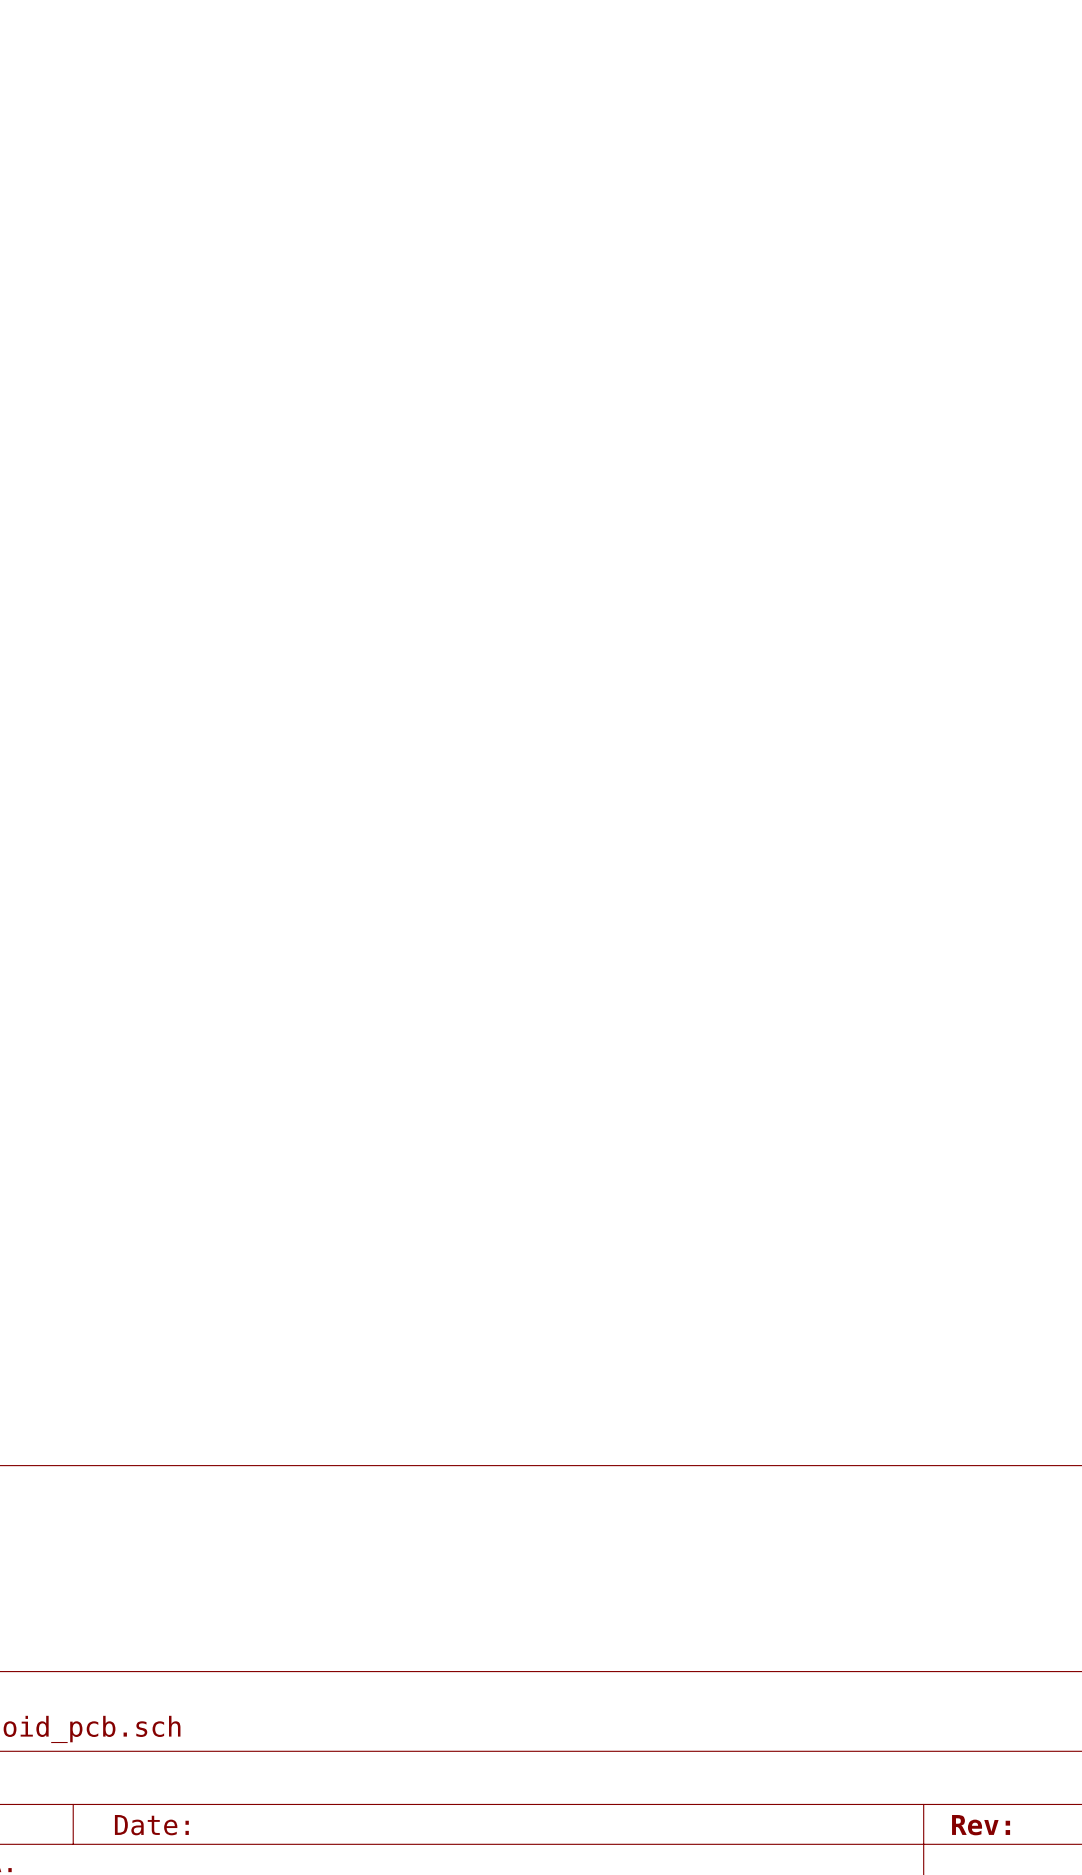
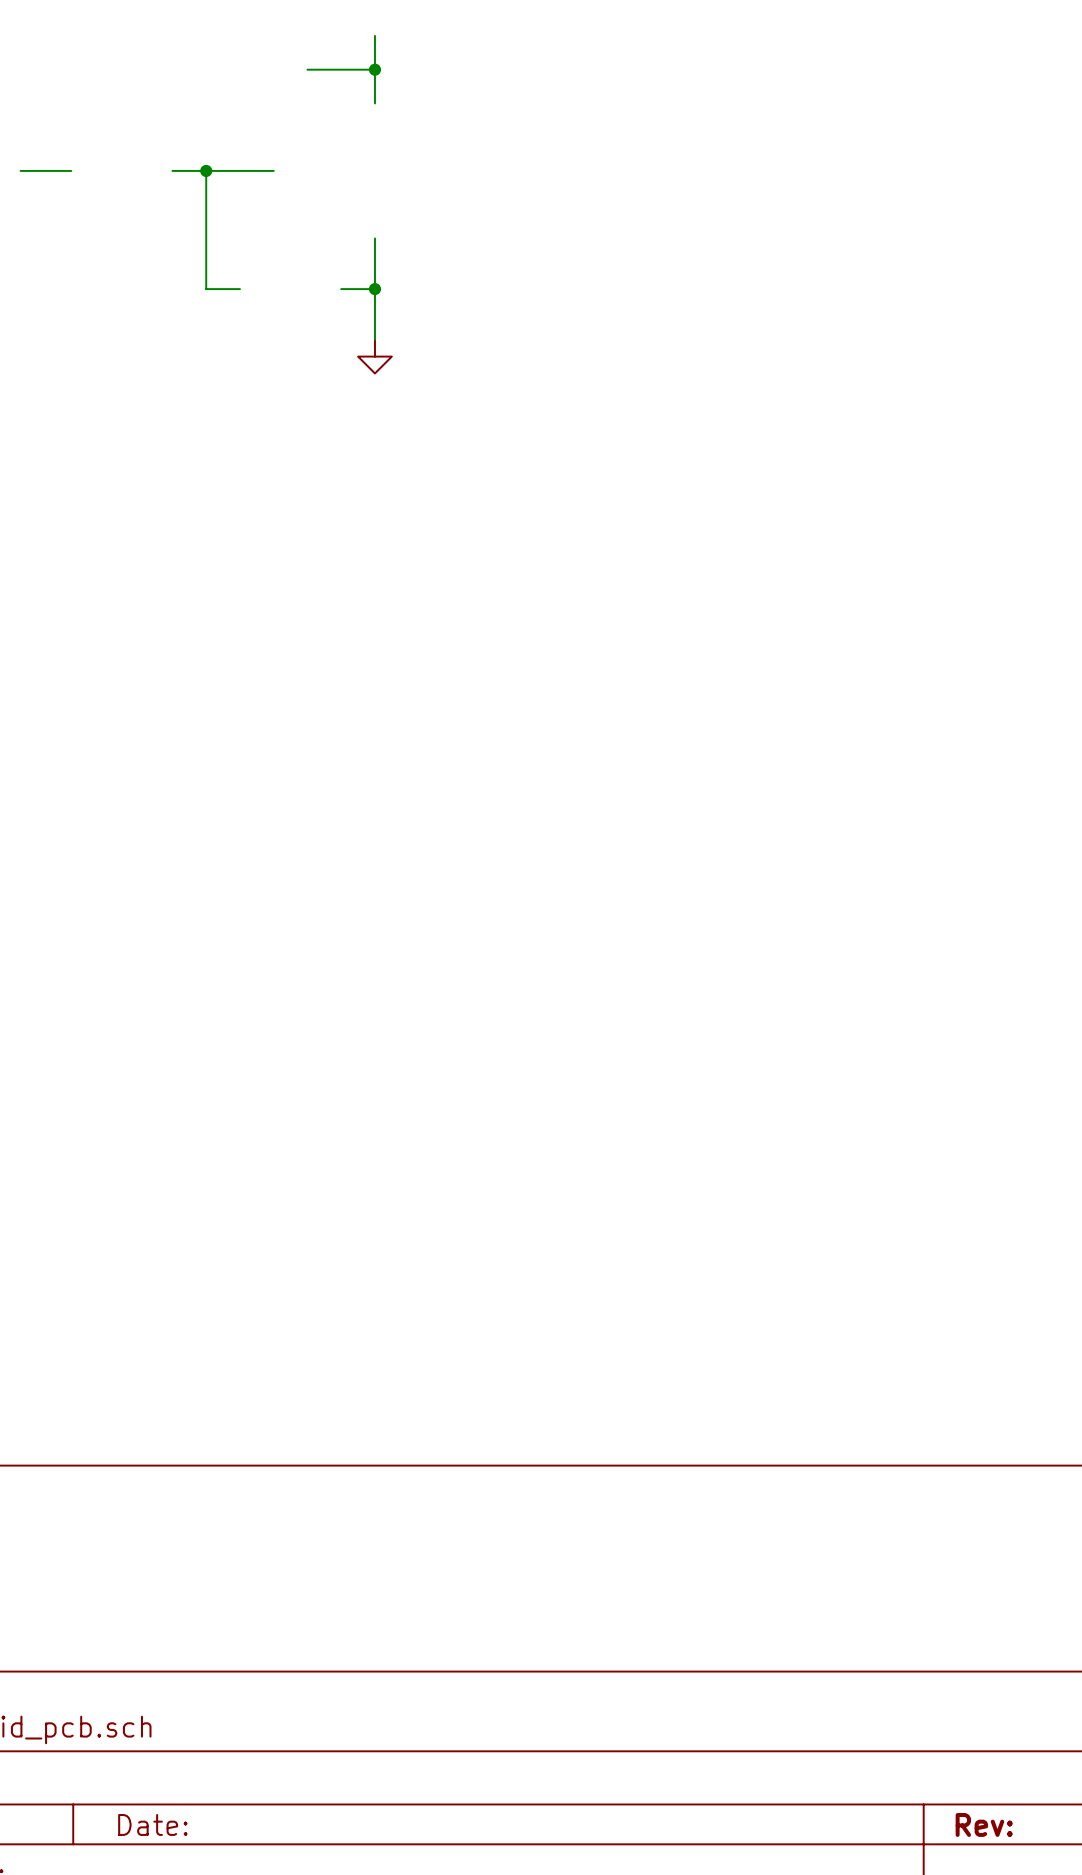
wire: none -> (374, 35) (374, 103)
wire: none -> (307, 69) (374, 69)
junction: none -> (374, 69)
wire: none -> (20, 170) (71, 170)
wire: none -> (172, 170) (273, 170)
wire: none -> (206, 170) (206, 289) (239, 289)
junction: none -> (206, 170)
wire: none -> (374, 238) (374, 339)
wire: none -> (341, 289) (374, 289)
junction: none -> (374, 289)
power symbol: none -> (374, 356)

